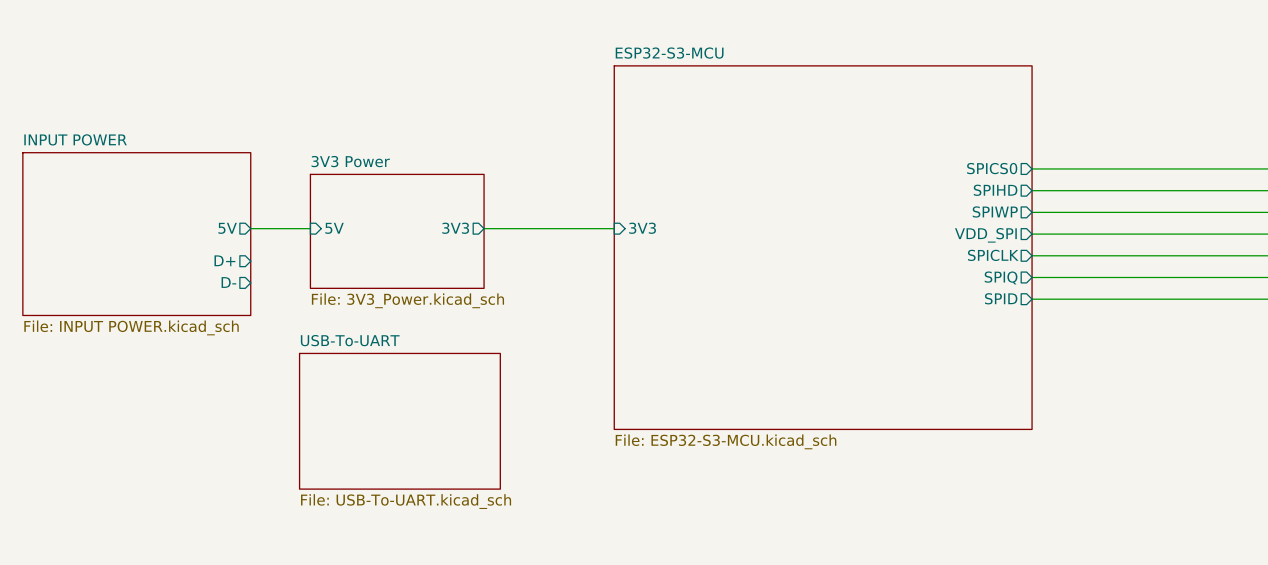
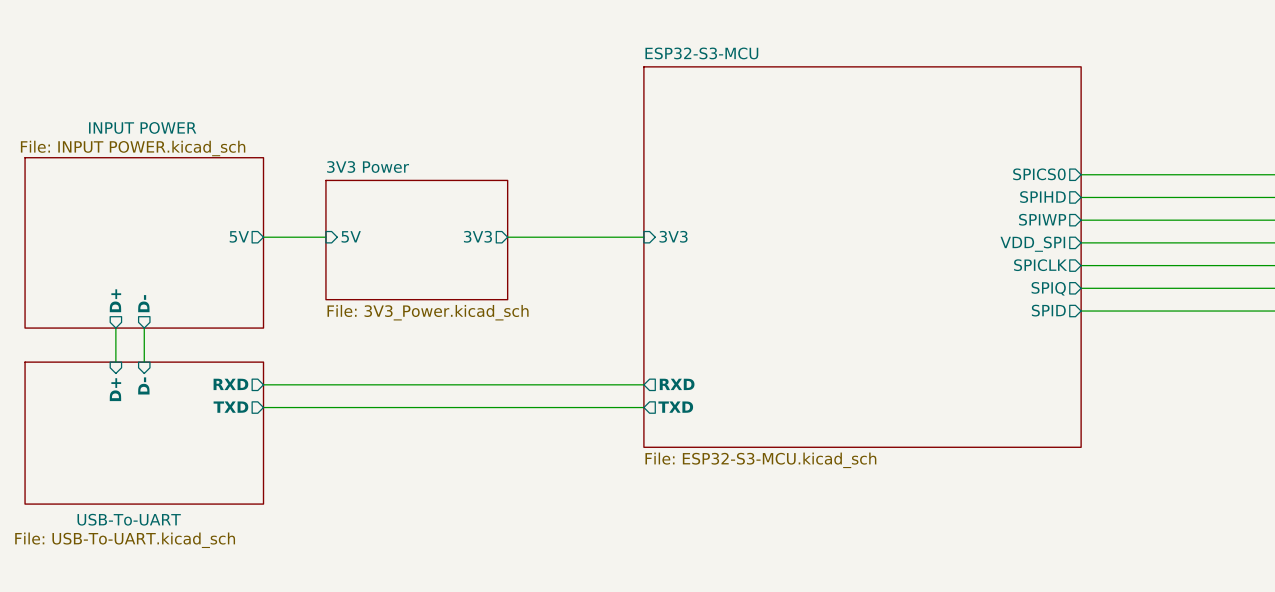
sheet INPUT POWER name position: INPUT POWER (75, 139) -> INPUT POWER (142, 127)
sheet pin: D+ (224, 260) -> none
sheet pin: D- (228, 282) -> none
sheet pin: none -> D+ (115, 300)
sheet pin: none -> D- (143, 303)
wire: none -> (115, 328) (115, 362)
wire: none -> (144, 328) (144, 362)
sheet INPUT POWER value position: File: INPUT POWER.kicad_sch (131, 327) -> File: INPUT POWER.kicad_sch (133, 148)
sheet pin: none -> RXD (230, 384)
wire: none -> (263, 384) (643, 384)
sheet pin: none -> RXD (677, 384)
sheet pin: none -> D- (143, 385)
sheet pin: none -> D+ (115, 389)
sheet pin: none -> TXD (230, 407)
wire: none -> (263, 407) (643, 407)
sheet pin: none -> TXD (675, 407)
sheet USB-To-UART: none -> File: USB-To-UART.kicad_sch (144, 433)
sheet USB-To-UART: File: USB-To-UART.kicad_sch (399, 421) -> none

